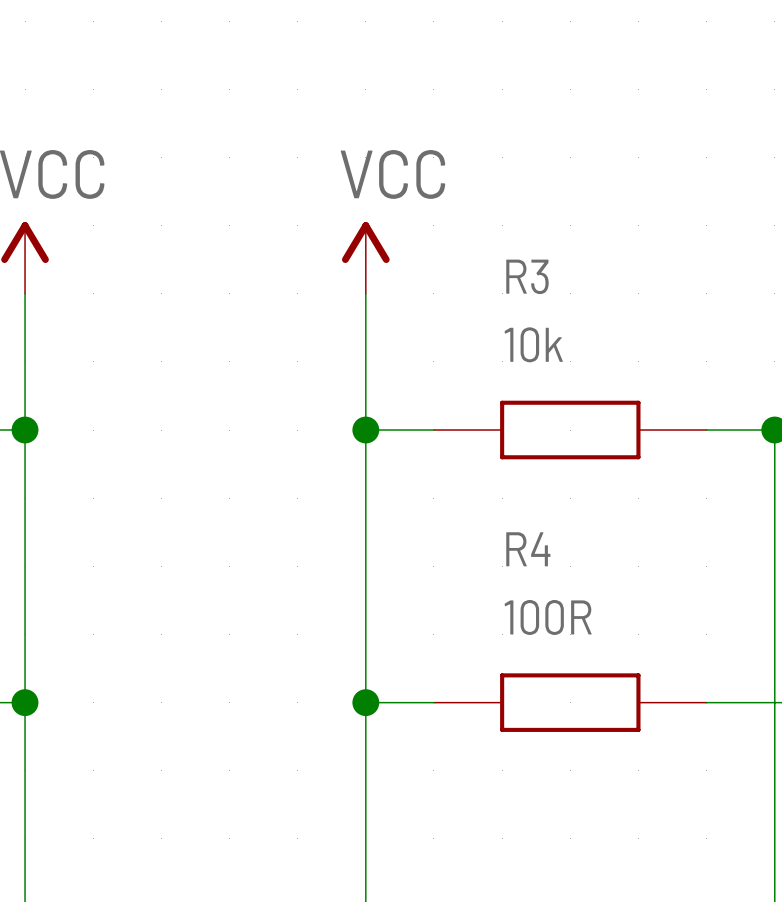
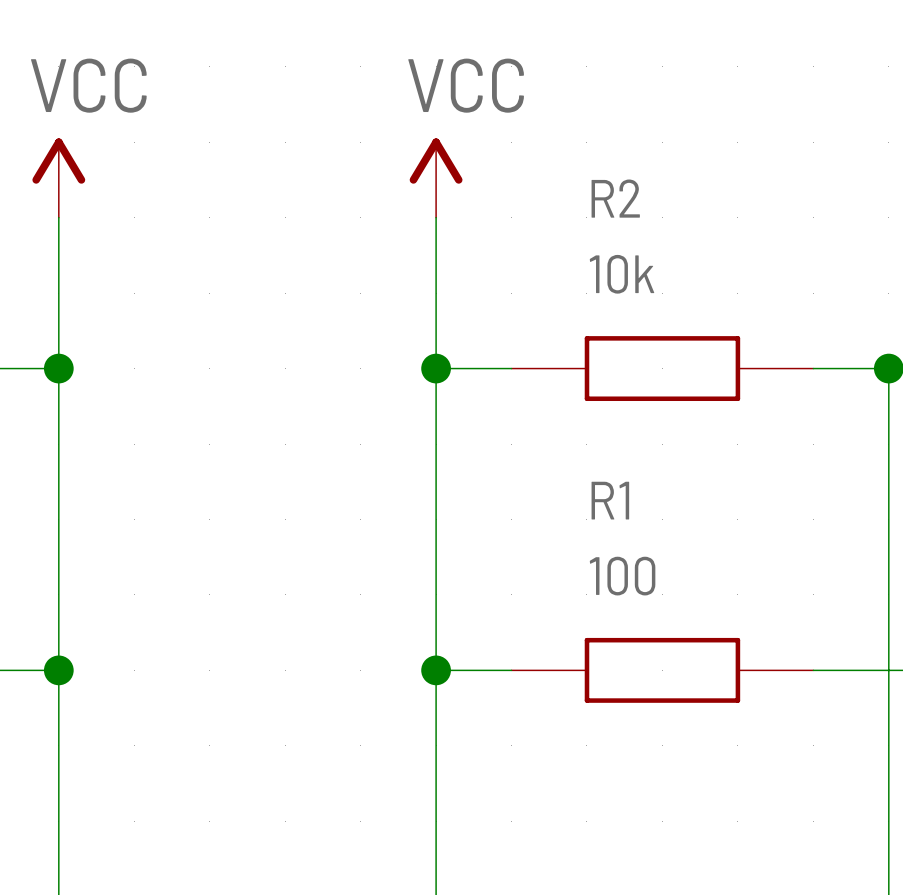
R3 name: R3 (527, 276) -> R2 (615, 198)
R4 name: R4 (528, 549) -> R1 (610, 500)
R4 value: 100R (548, 617) -> 100 (622, 576)

